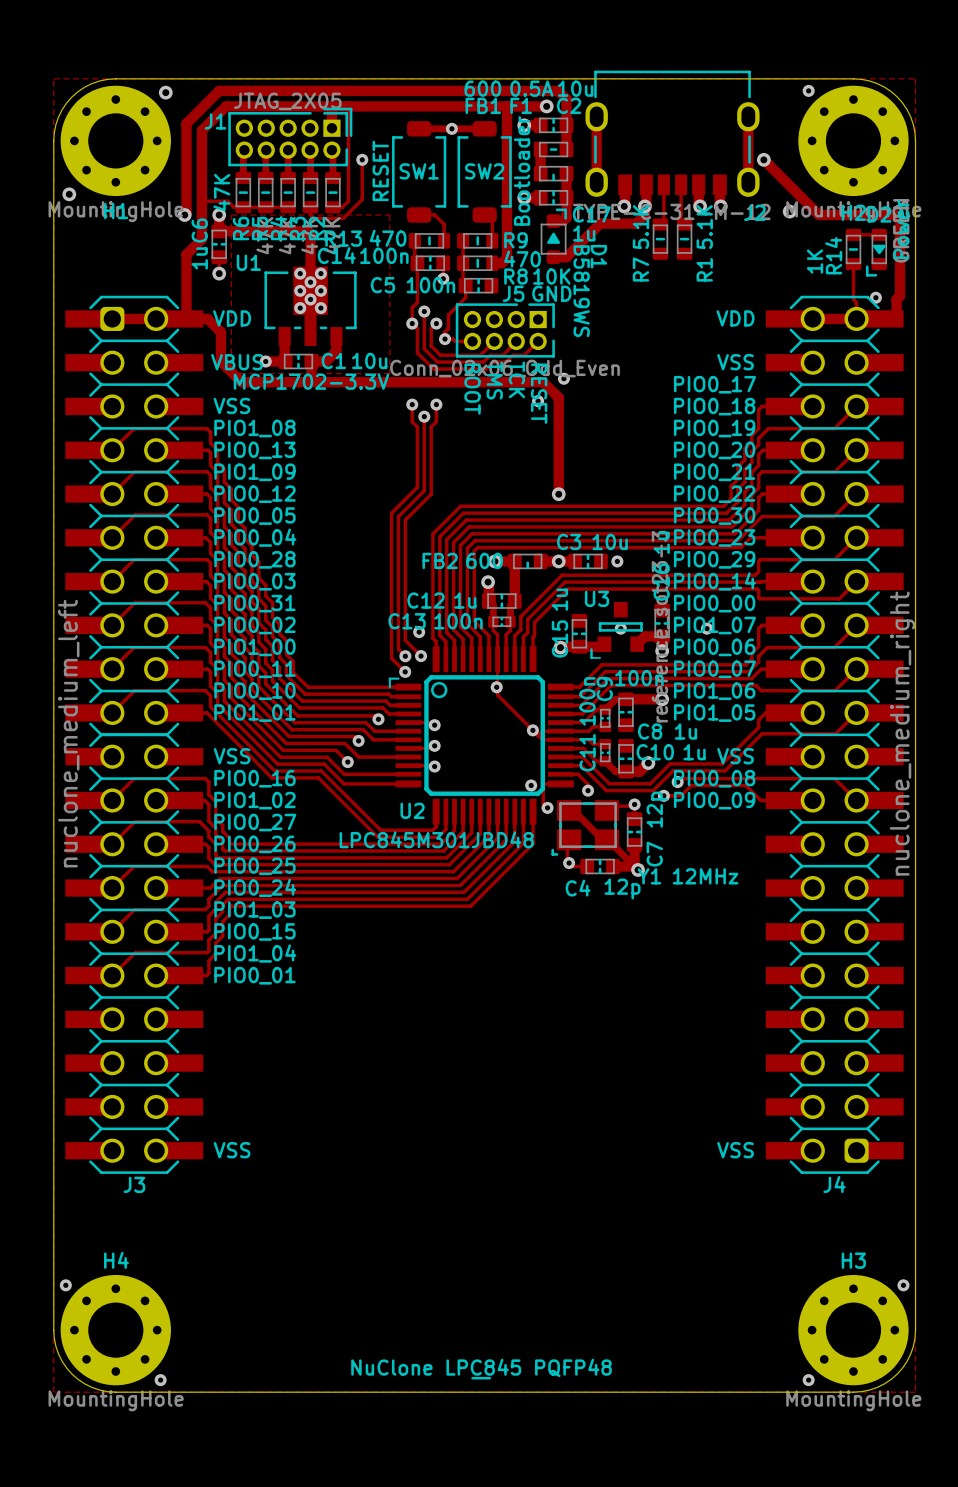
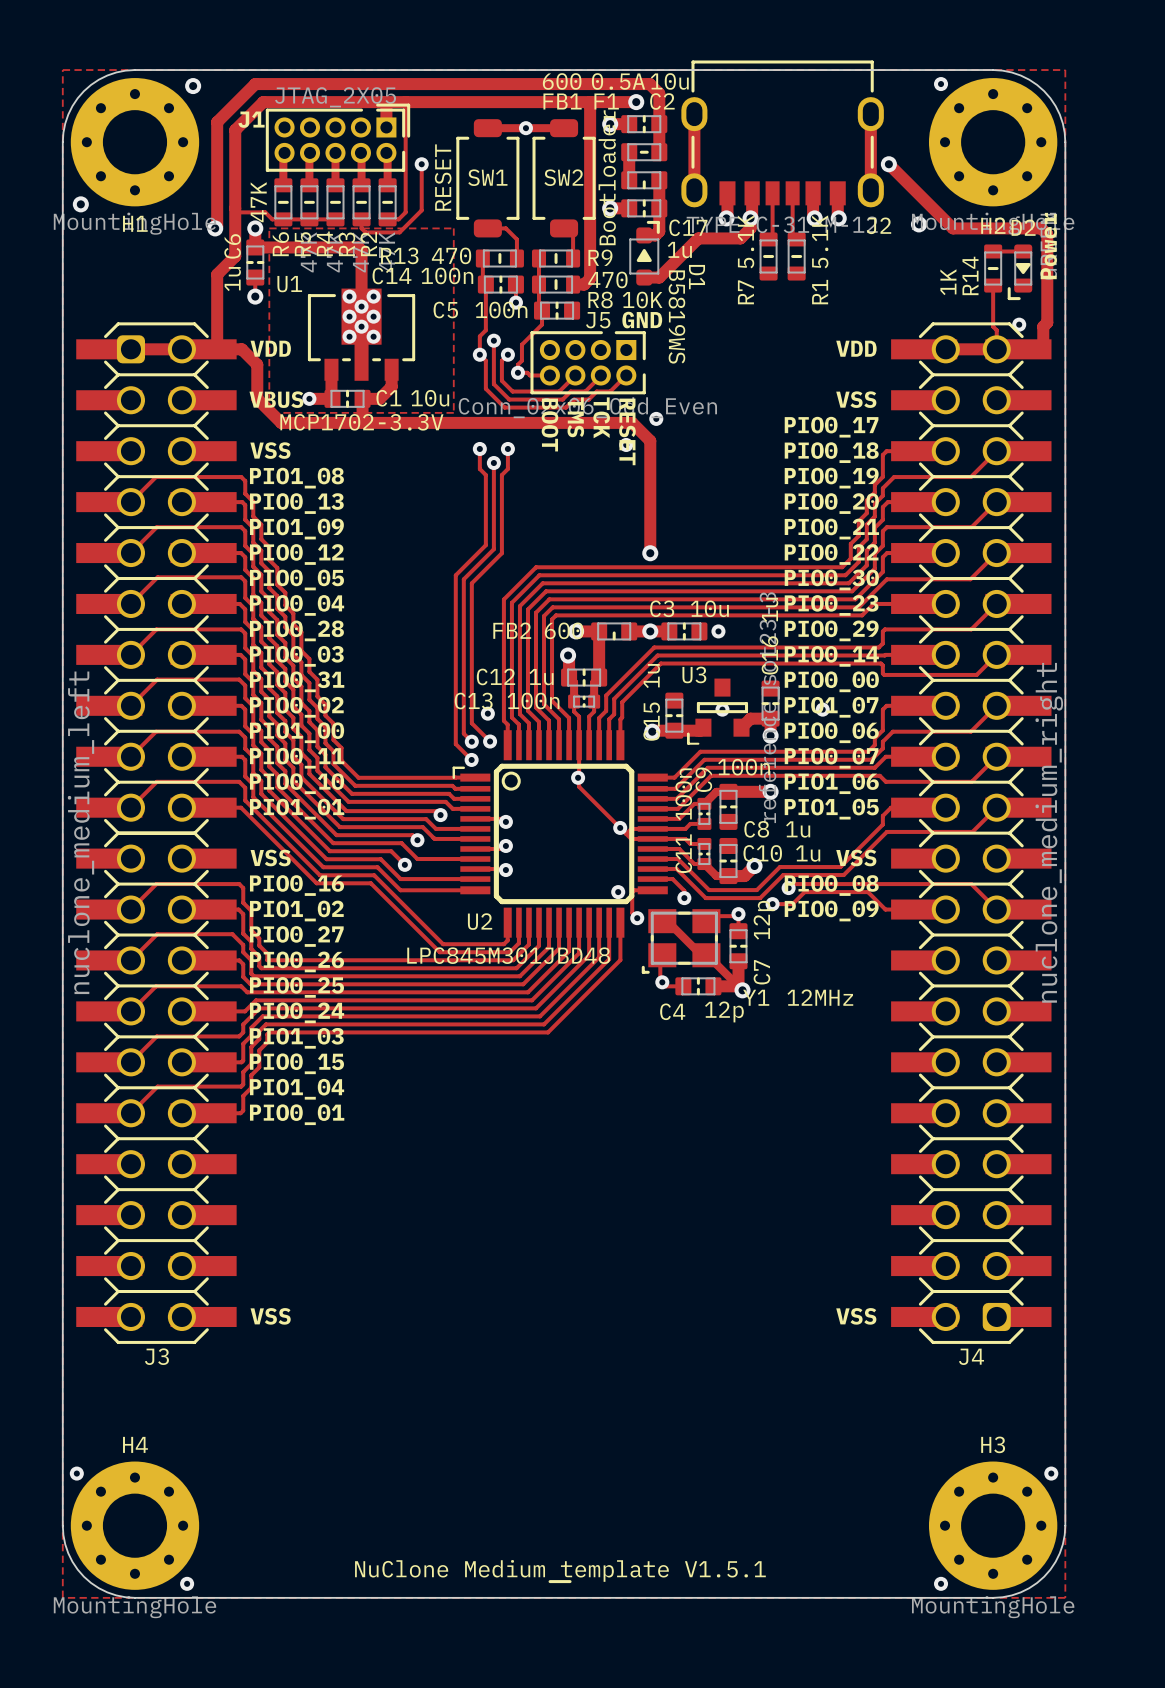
drawing shape: [351, 1358, 612, 1380] -> [355, 1560, 766, 1584]

